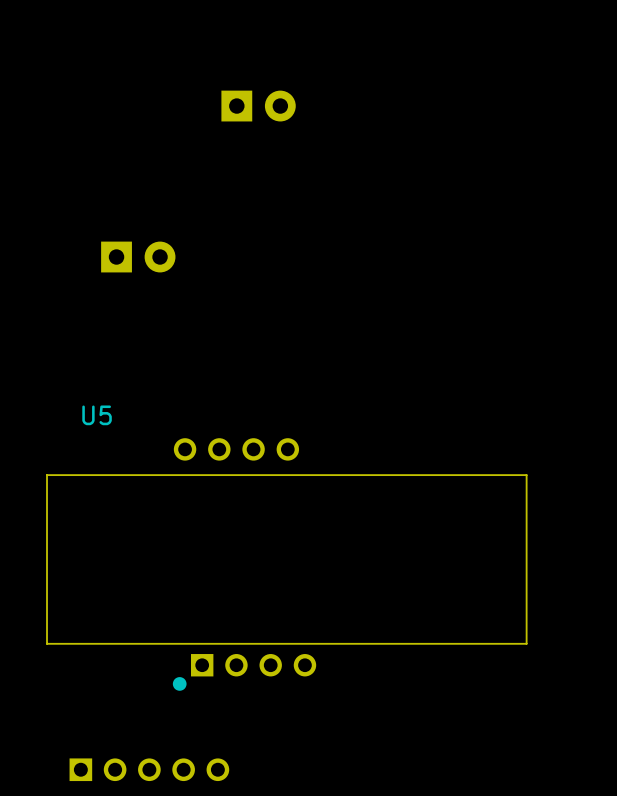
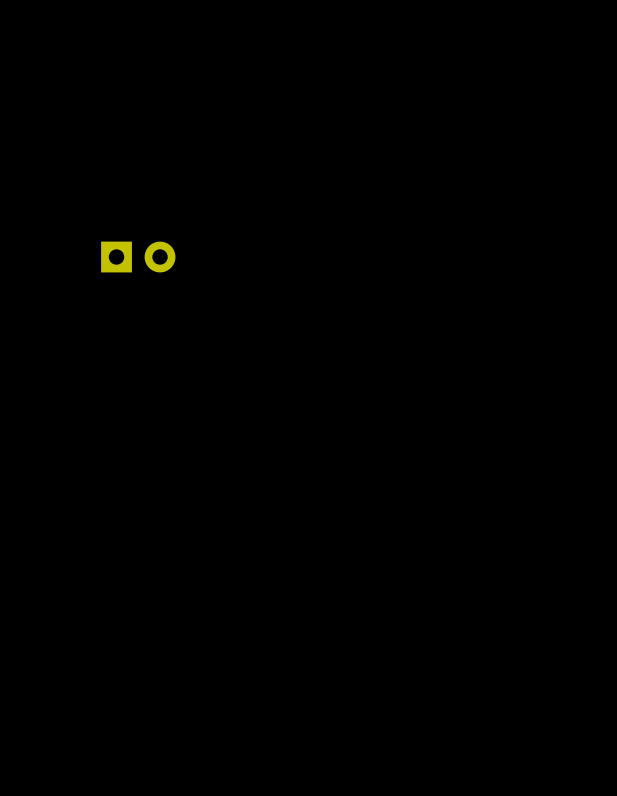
part: (258, 106) -> none
U5: (286, 564) -> none
part: (149, 769) -> none

